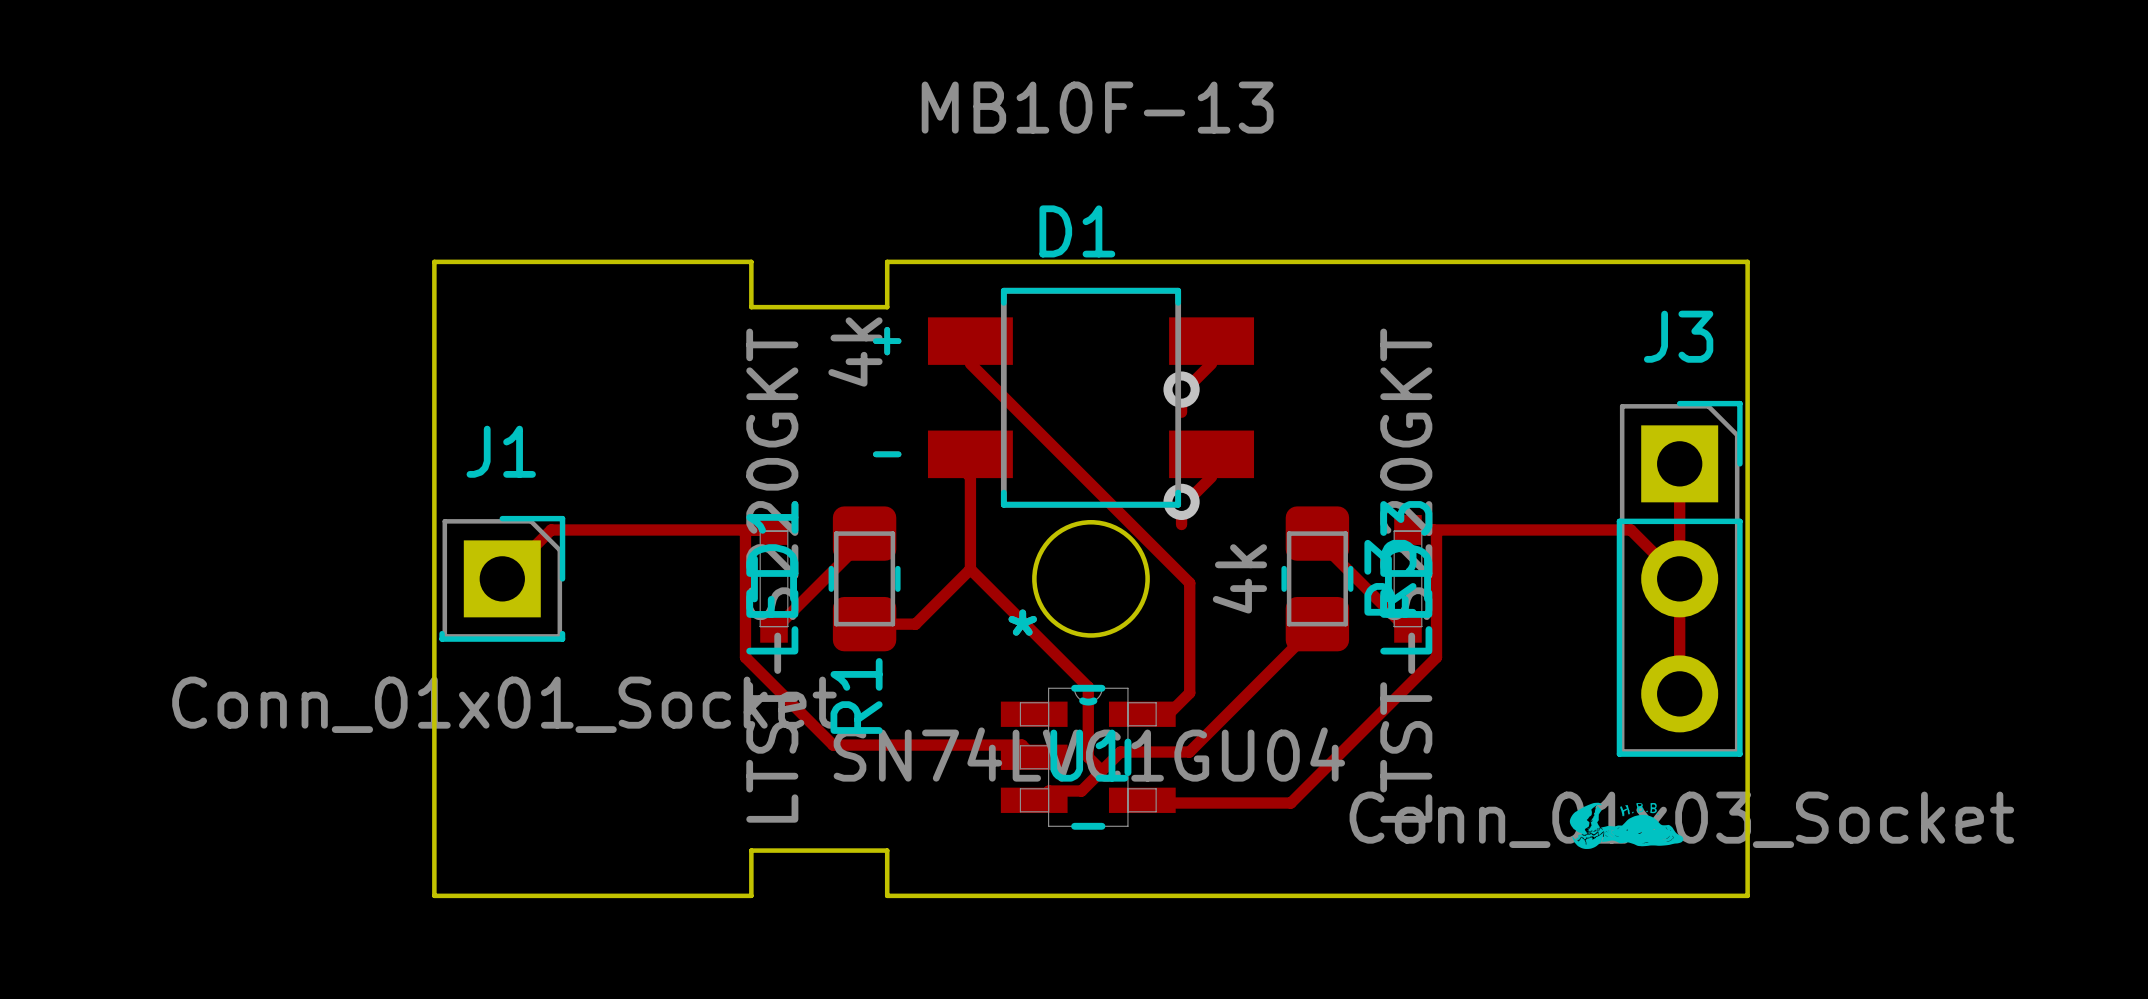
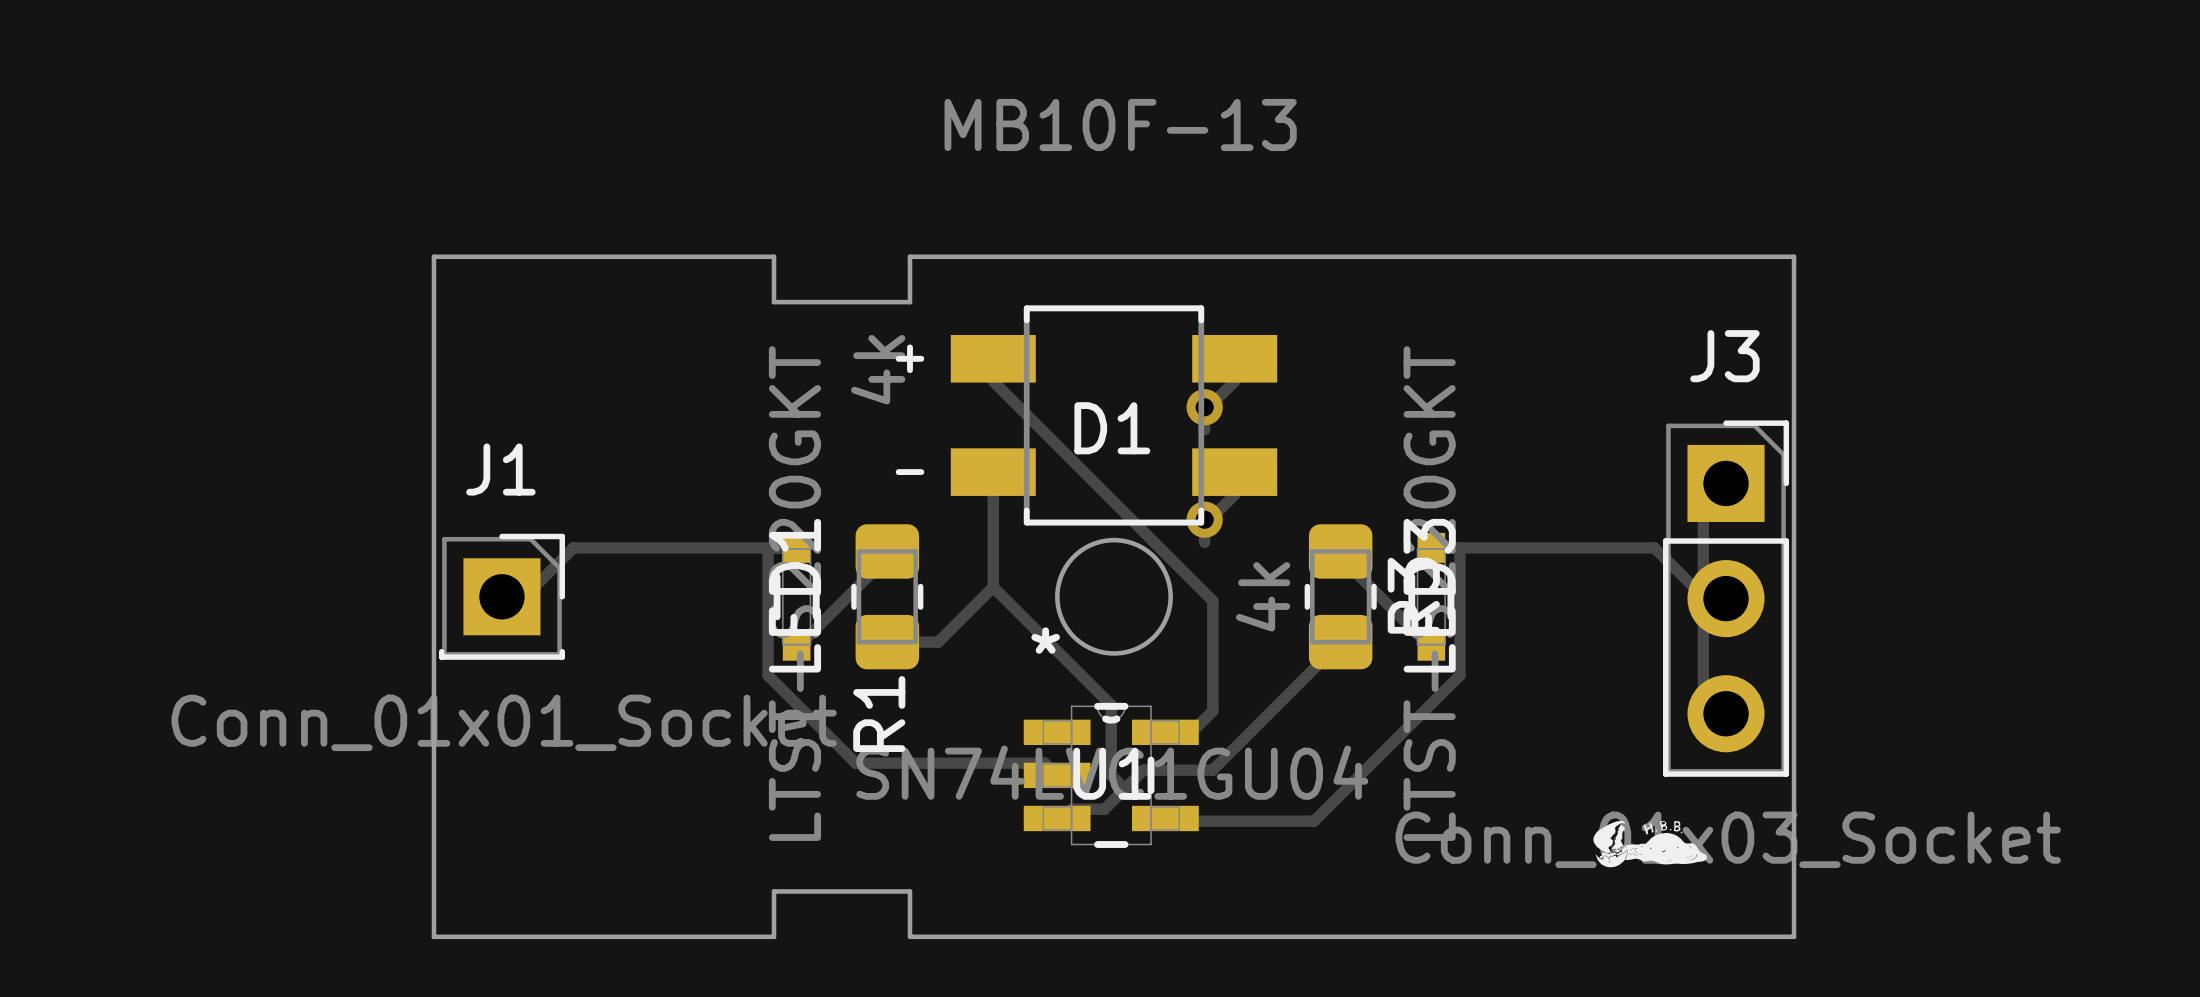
D1 name position: D1 (1077, 231) -> D1 (1112, 428)
board edge: (751, 261) (434, 261) (434, 895) (751, 895) -> (773, 279) (773, 256) (433, 256) (433, 936) (773, 936) (773, 914)
board edge: (887, 261) (1747, 261) (1747, 895) (887, 895) -> (909, 279) (909, 256) (1794, 256) (1794, 936) (909, 936) (909, 914)
board edge: (751, 284) (751, 307) (887, 307) (887, 284) -> (773, 302) (909, 302)
J1 position: (502, 578) -> (501, 596)
J3 position: (1679, 578) -> (1726, 598)
board edge: (751, 873) (751, 850) (887, 850) (887, 873) -> (773, 891) (909, 891)

